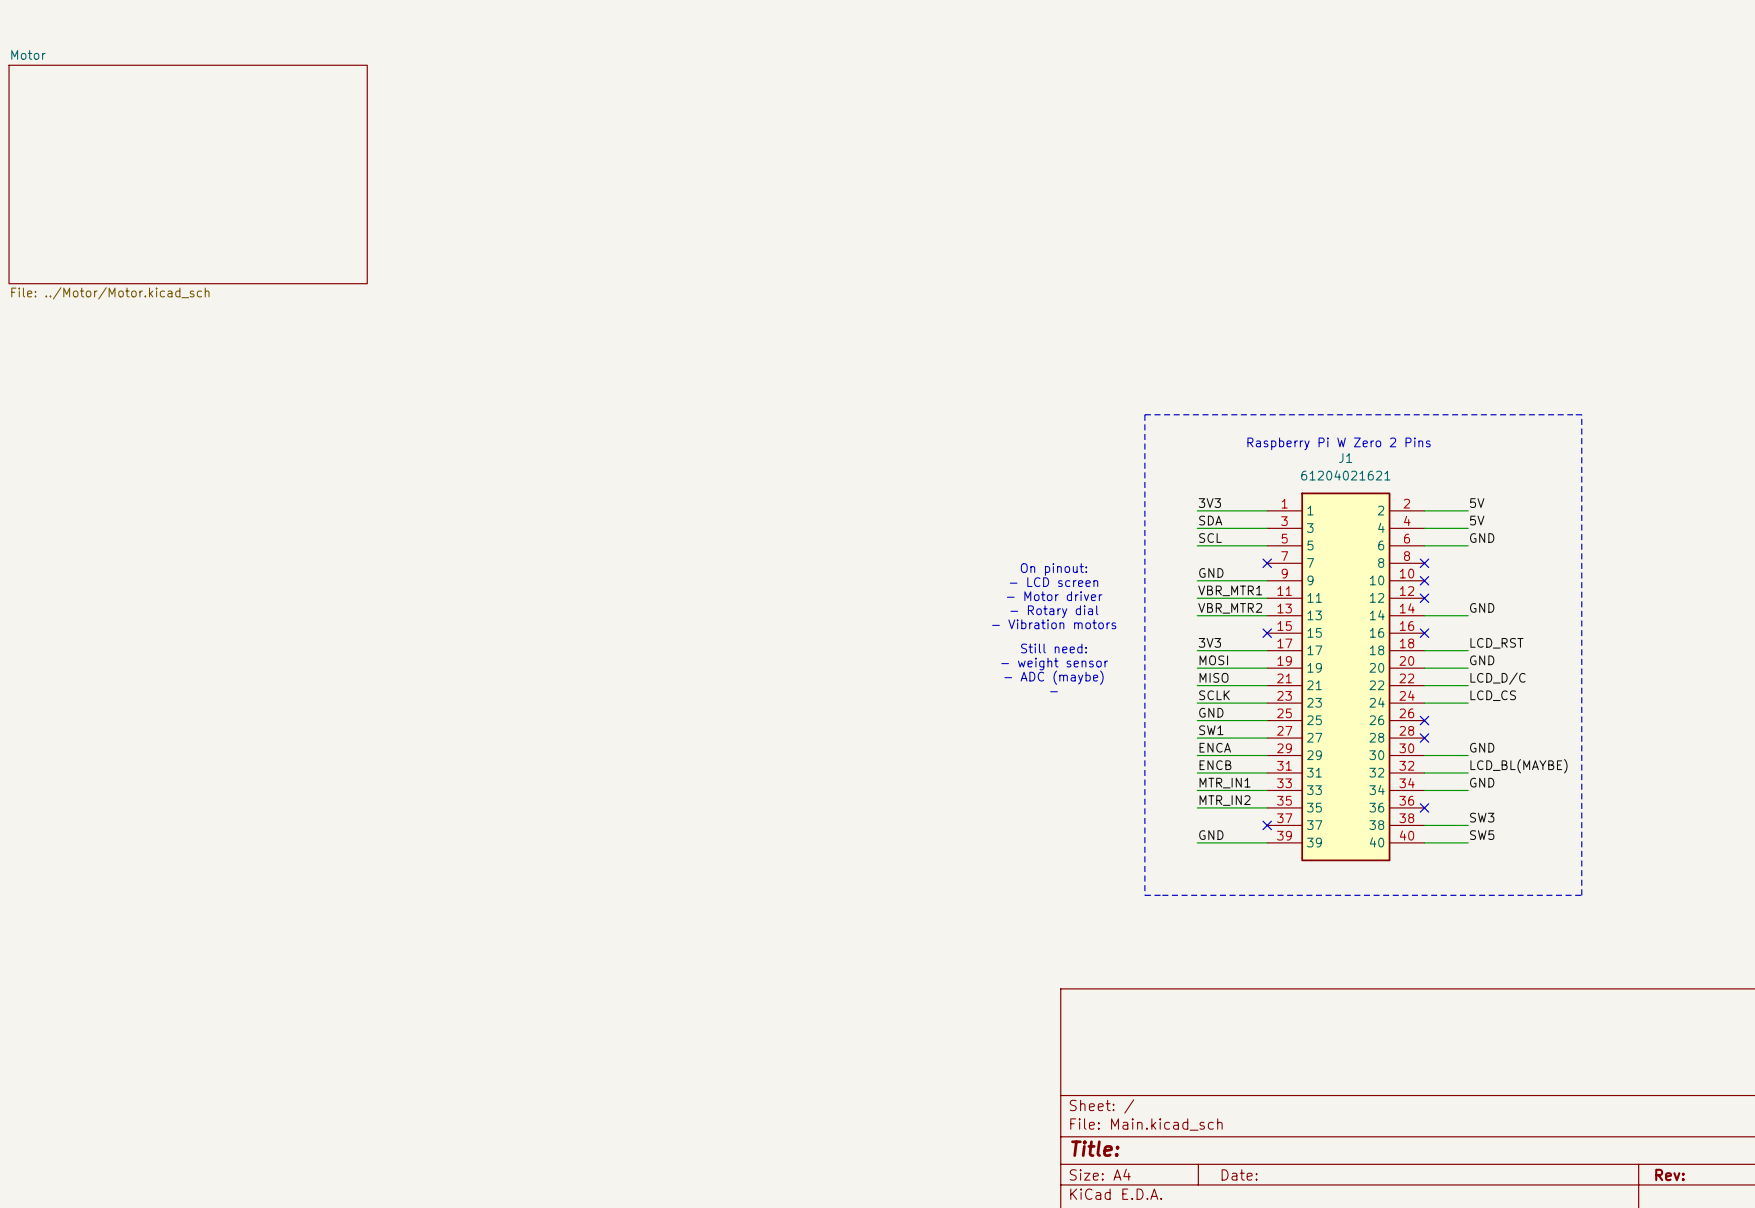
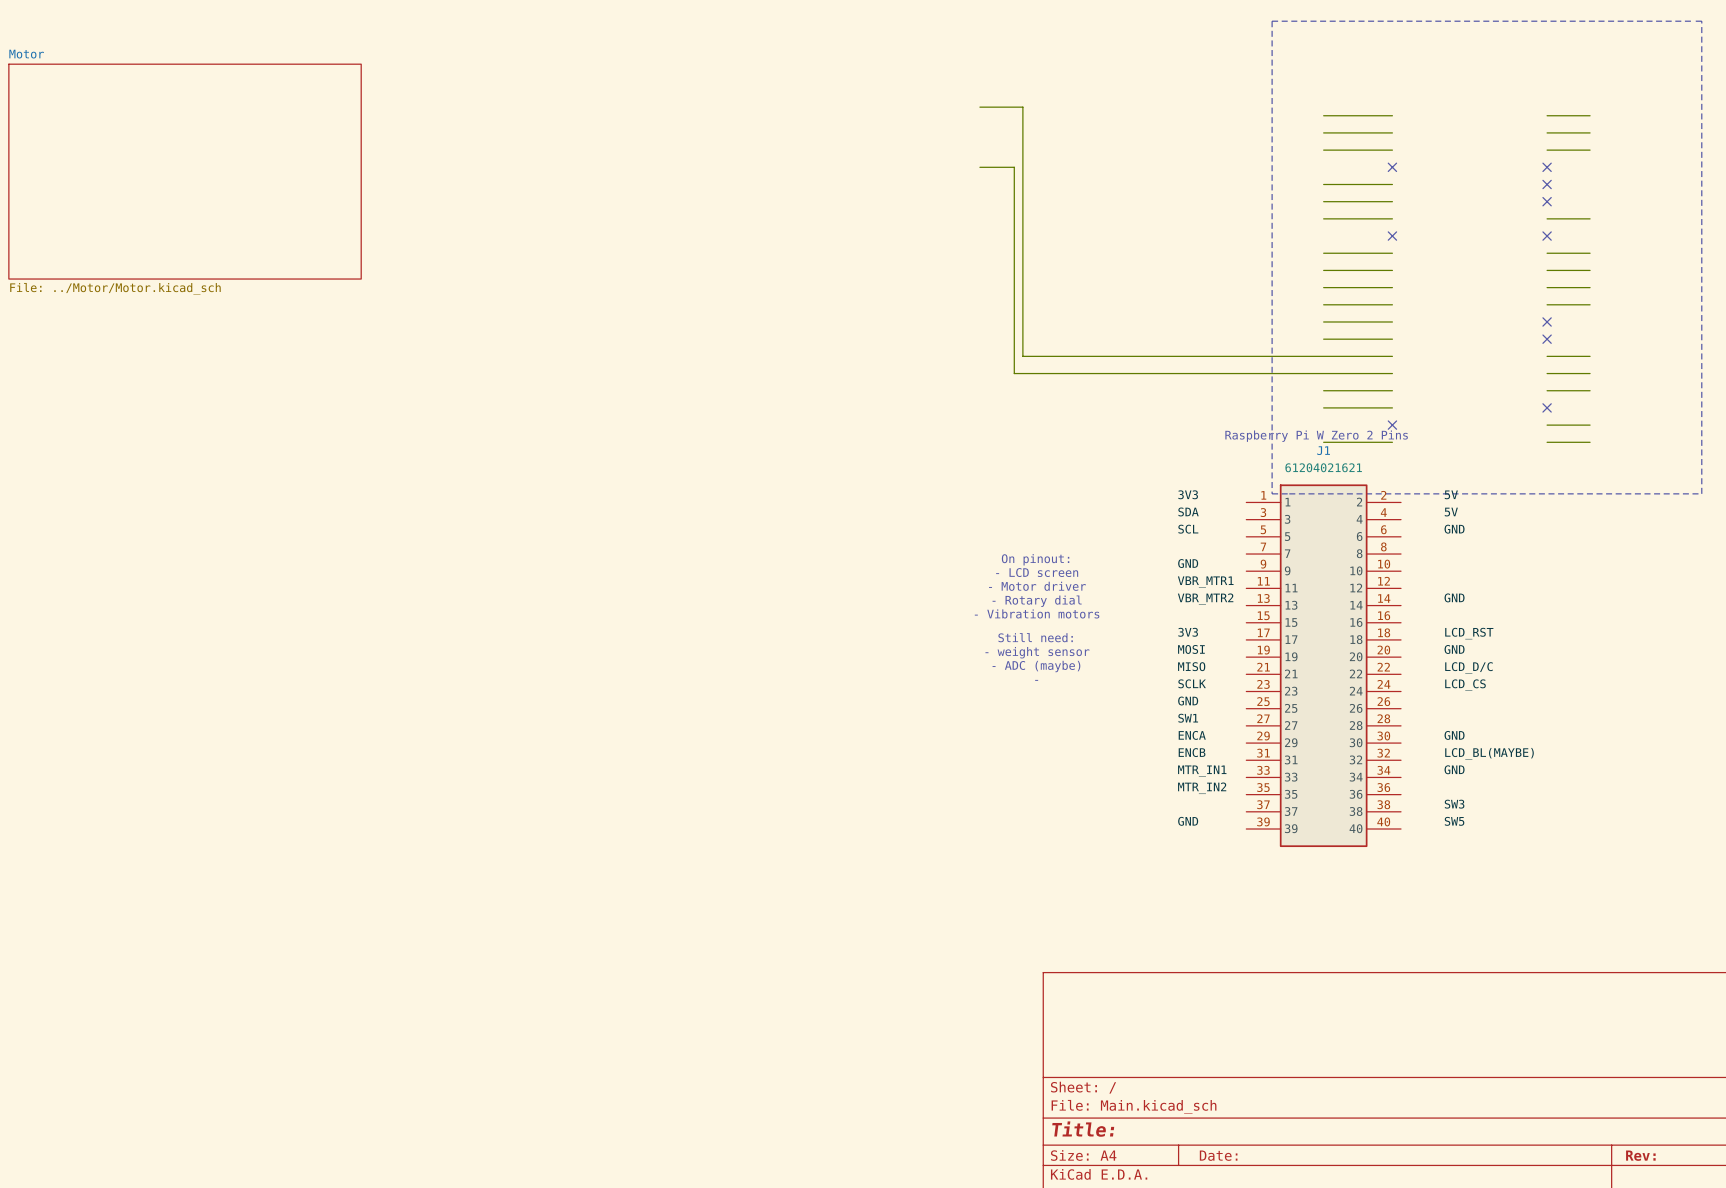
line: none -> (1272, 21) (1272, 493) (1701, 493) (1701, 21) (1272, 21)
wire: none -> (979, 107) (1022, 107) (1022, 356) (1392, 356)
wire: none -> (1323, 115) (1392, 115)
wire: none -> (1547, 115) (1590, 115)
wire: none -> (1323, 132) (1392, 132)
wire: none -> (1547, 132) (1590, 132)
wire: none -> (1323, 150) (1392, 150)
wire: none -> (1547, 150) (1590, 150)
wire: none -> (979, 167) (1014, 167) (1014, 373) (1392, 373)
no-connect mark: none -> (1392, 167)
no-connect mark: none -> (1547, 167)
wire: none -> (1323, 184) (1392, 184)
no-connect mark: none -> (1547, 184)
wire: none -> (1323, 201) (1392, 201)
no-connect mark: none -> (1547, 201)
wire: none -> (1323, 218) (1392, 218)
wire: none -> (1547, 218) (1590, 218)
no-connect mark: none -> (1392, 236)
no-connect mark: none -> (1547, 236)
wire: none -> (1323, 253) (1392, 253)
wire: none -> (1547, 253) (1590, 253)
wire: none -> (1323, 270) (1392, 270)
wire: none -> (1547, 270) (1590, 270)
wire: none -> (1323, 287) (1392, 287)
wire: none -> (1547, 287) (1590, 287)
wire: none -> (1323, 304) (1392, 304)
wire: none -> (1547, 304) (1590, 304)
wire: none -> (1323, 321) (1392, 321)
no-connect mark: none -> (1547, 321)
wire: none -> (1323, 339) (1392, 339)
no-connect mark: none -> (1547, 339)
wire: none -> (1547, 356) (1590, 356)
wire: none -> (1547, 373) (1590, 373)
wire: none -> (1323, 390) (1392, 390)
wire: none -> (1547, 390) (1590, 390)
line: (1144, 414) (1144, 895) (1581, 895) (1581, 414) (1144, 414) -> none
no-connect mark: none -> (1547, 407)
no-connect mark: none -> (1392, 425)
wire: (1197, 510) (1267, 510) -> none
wire: (1424, 510) (1468, 510) -> (1547, 425) (1590, 425)
wire: (1197, 528) (1267, 528) -> (1323, 442) (1392, 442)
wire: (1424, 528) (1468, 528) -> (1547, 442) (1590, 442)
wire: (1197, 545) (1267, 545) -> none
wire: (1424, 545) (1468, 545) -> none
no-connect mark: (1267, 563) -> none
no-connect mark: (1424, 563) -> none
wire: (1197, 580) (1267, 580) -> none
no-connect mark: (1424, 580) -> none
wire: (1197, 598) (1267, 598) -> none
no-connect mark: (1424, 598) -> none
wire: (1197, 615) (1267, 615) -> none
wire: (1424, 615) (1468, 615) -> none
no-connect mark: (1267, 633) -> none
no-connect mark: (1424, 633) -> none
wire: (1197, 650) (1267, 650) -> none
wire: (1424, 650) (1468, 650) -> none
wire: (1197, 668) (1267, 668) -> none
wire: (1424, 668) (1468, 668) -> none
wire: (1197, 685) (1267, 685) -> none
wire: (1424, 685) (1468, 685) -> none
wire: (1197, 703) (1267, 703) -> none
wire: (1424, 703) (1468, 703) -> none
wire: (1197, 720) (1267, 720) -> none
no-connect mark: (1424, 720) -> none
wire: (1197, 738) (1267, 738) -> none
no-connect mark: (1424, 738) -> none
wire: (1197, 755) (1267, 755) -> none
wire: (1424, 755) (1468, 755) -> none
wire: (1197, 773) (1267, 773) -> none
wire: (1424, 773) (1468, 773) -> none
wire: (1197, 790) (1267, 790) -> none
wire: (1424, 790) (1468, 790) -> none
wire: (1197, 807) (1267, 807) -> none
no-connect mark: (1424, 807) -> none
no-connect mark: (1267, 825) -> none
wire: (1424, 825) (1468, 825) -> none
wire: (1197, 842) (1267, 842) -> none
wire: (1424, 842) (1468, 842) -> none

